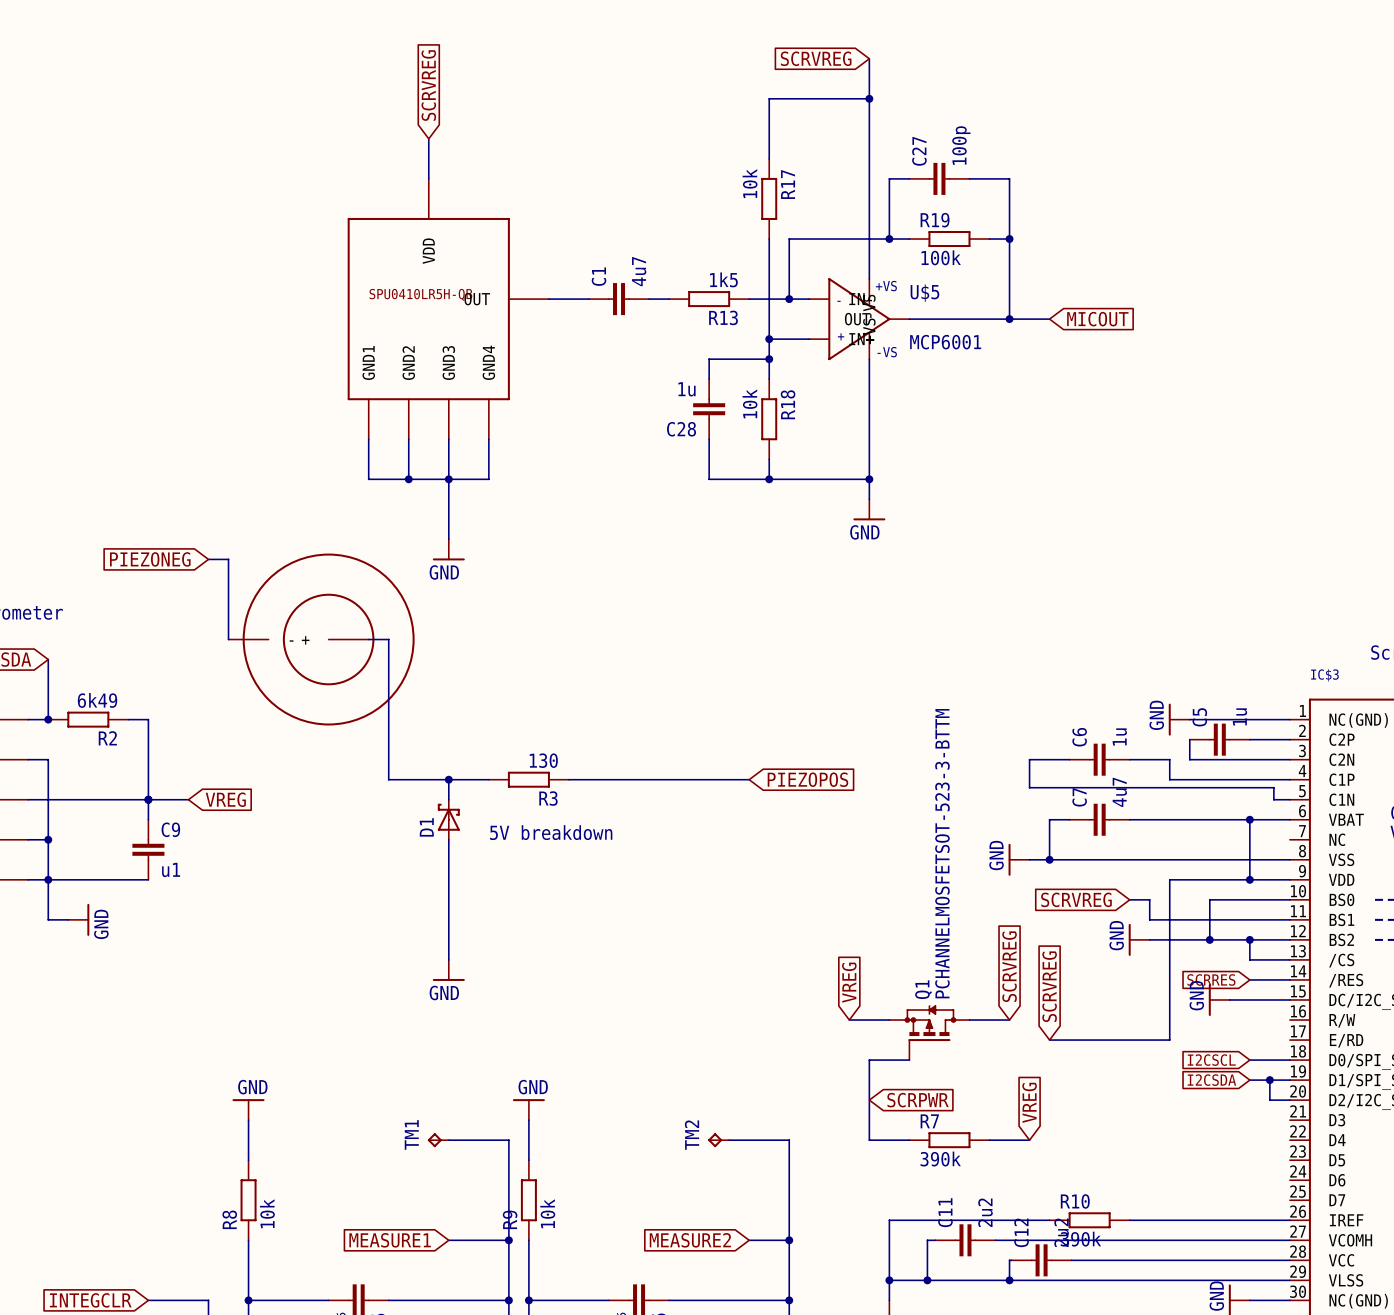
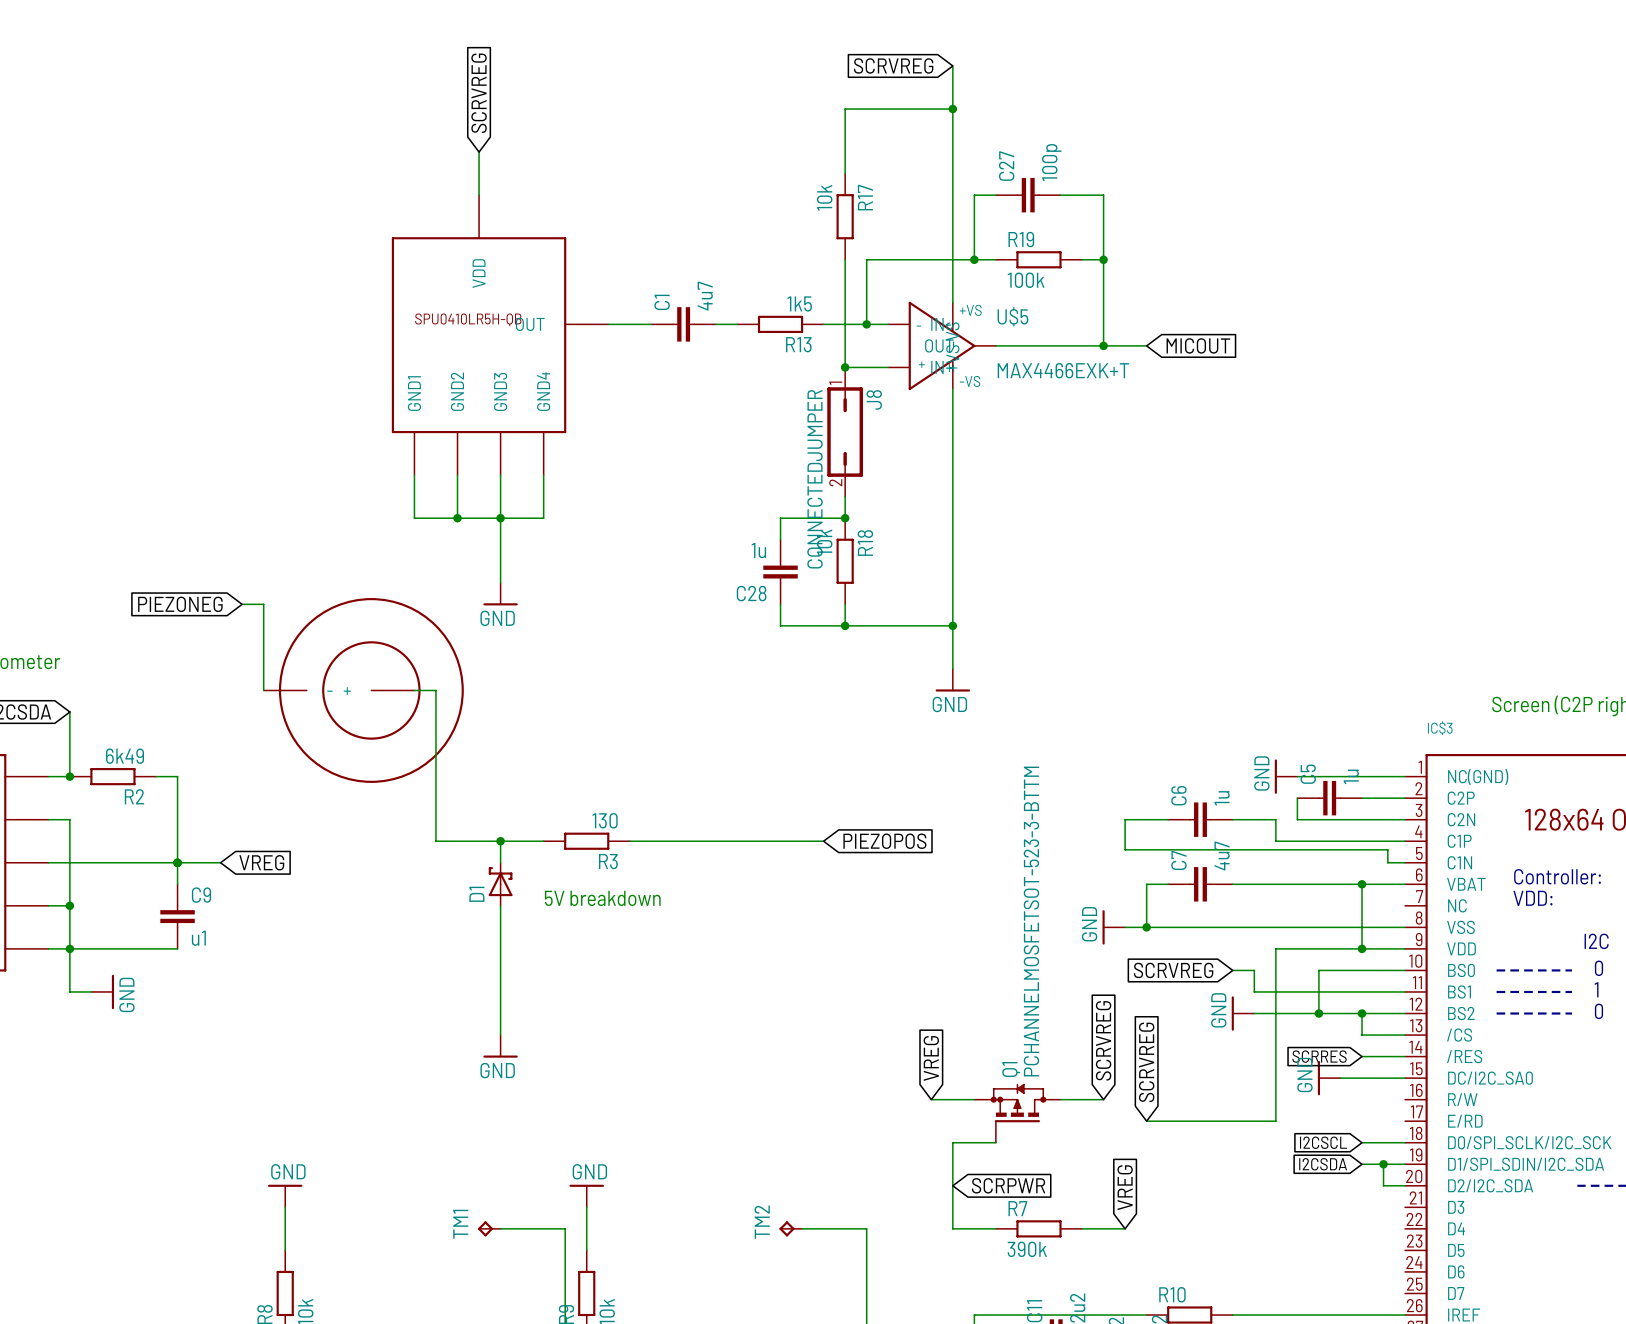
U$5 value: MCP6001 (945, 342) -> MAX4466EXK+T (1063, 370)
wire: (769, 359) (709, 359) (709, 379) -> none
junction: (769, 359) -> none
J8: none -> CONNECTEDJUMPER (845, 432)
C28 position: (709, 409) -> (780, 572)
R18 position: (769, 419) -> (845, 561)
wire: (709, 439) (709, 479) -> (780, 539) (780, 518)
wire: (769, 479) (869, 479) -> none
junction: (869, 479) -> none
wire: none -> (952, 539) (952, 668)
power symbol position: GND (869, 509) -> GND (952, 680)
wire: none -> (780, 604) (780, 625) (952, 625)
wire: none -> (845, 604) (845, 625)
junction: none -> (845, 625)
junction: none -> (952, 625)

